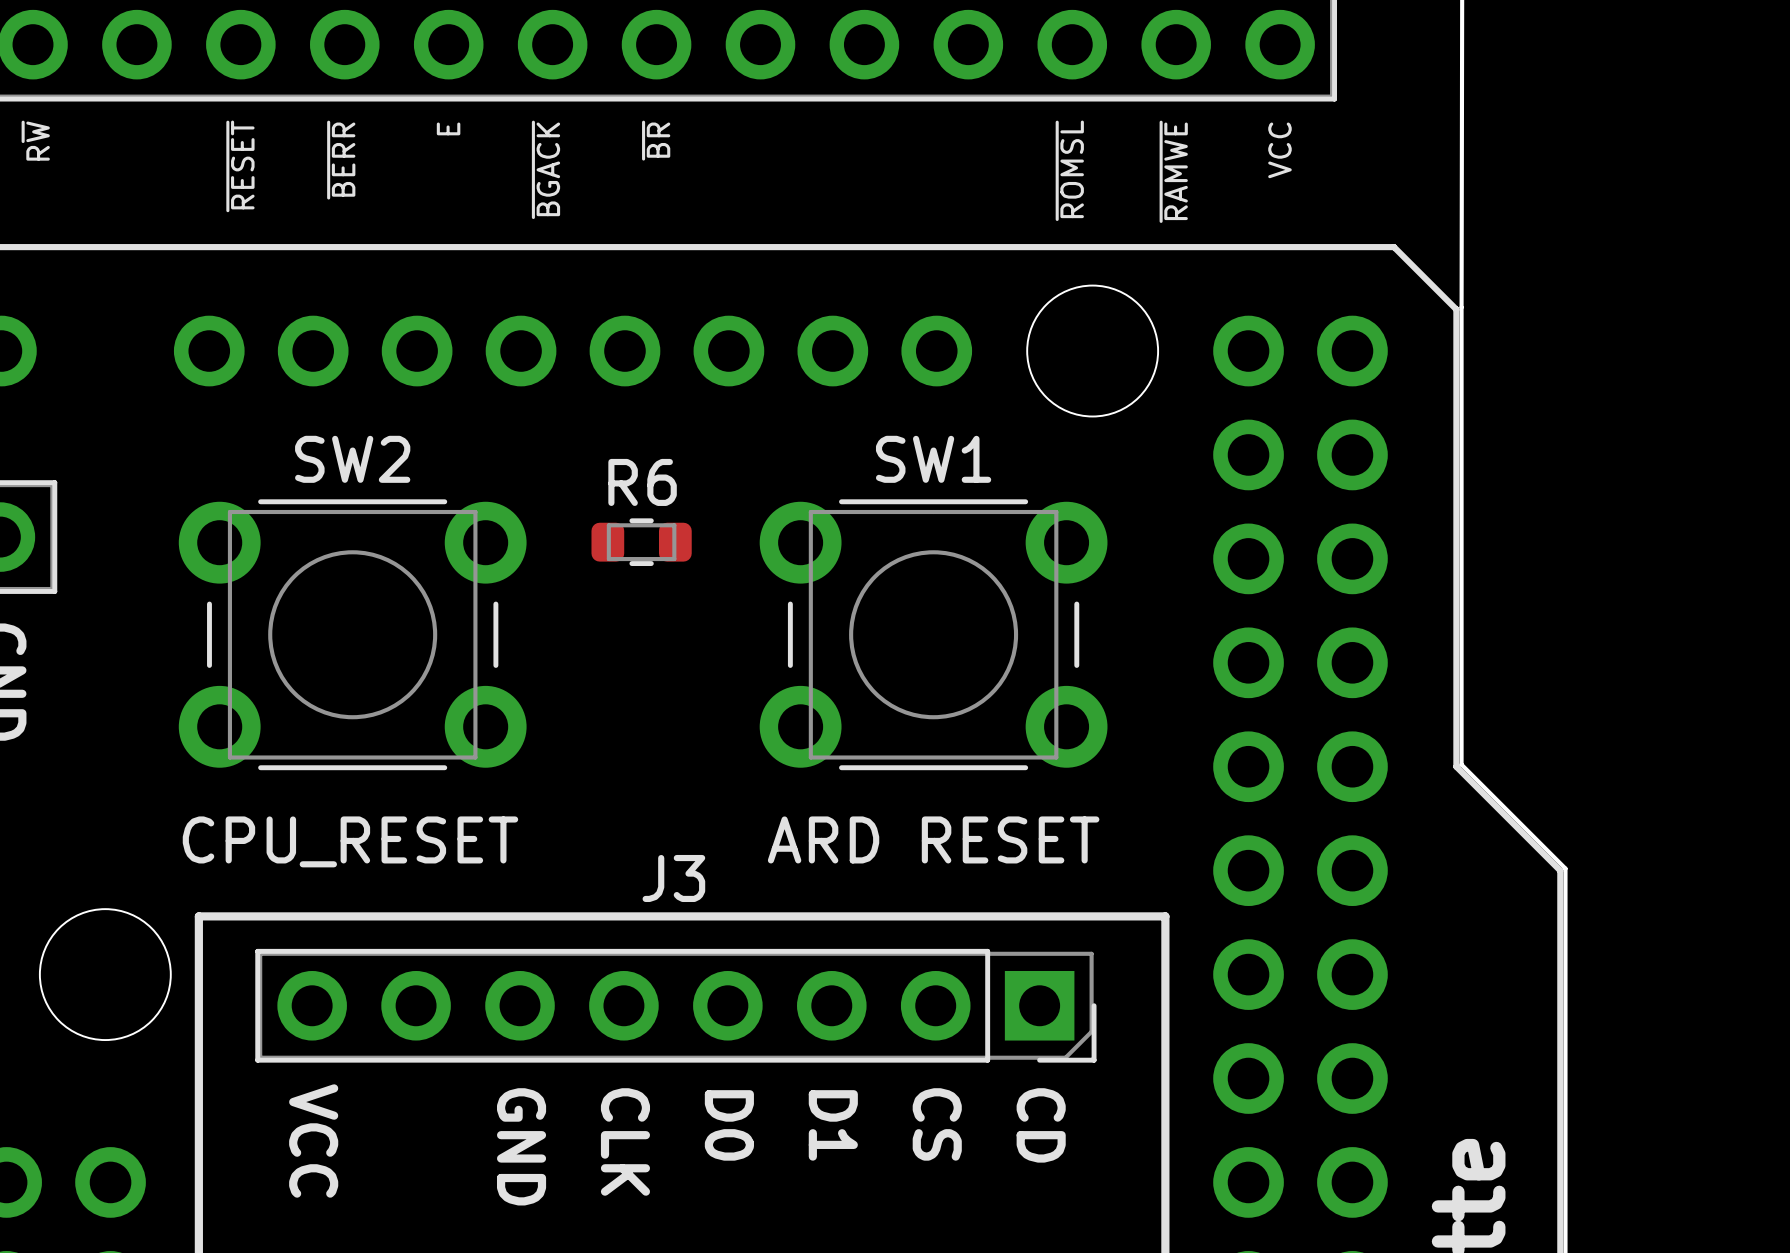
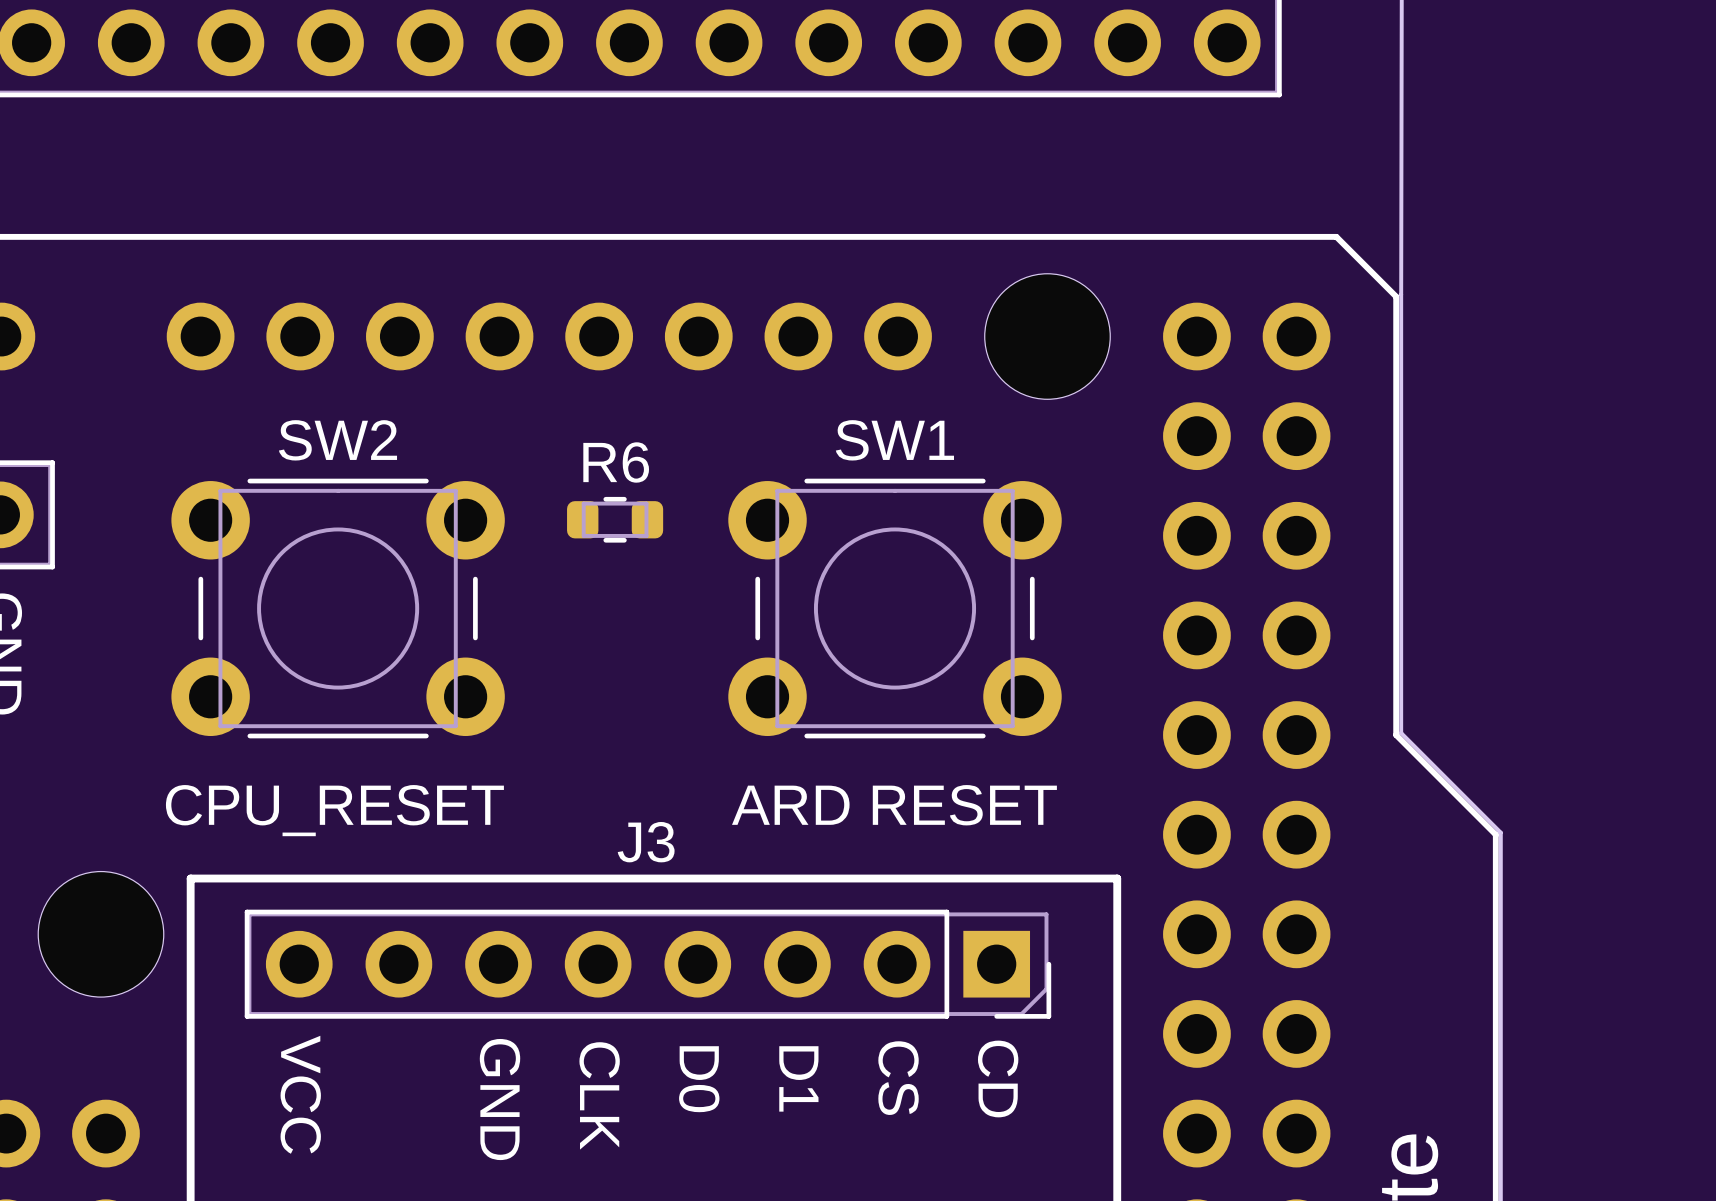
text: E (448, 128) -> none
text: R~{W} (35, 140) -> none
text: ~{BR} (656, 140) -> none
text: VCC (1279, 150) -> none
text: ~{BERR} (341, 160) -> none
text: ~{RESET} (240, 166) -> none
text: ~{BGACK} (545, 169) -> none
text: ~{ROMSL} (1069, 170) -> none
text: ~{RAMWE} (1173, 171) -> none

